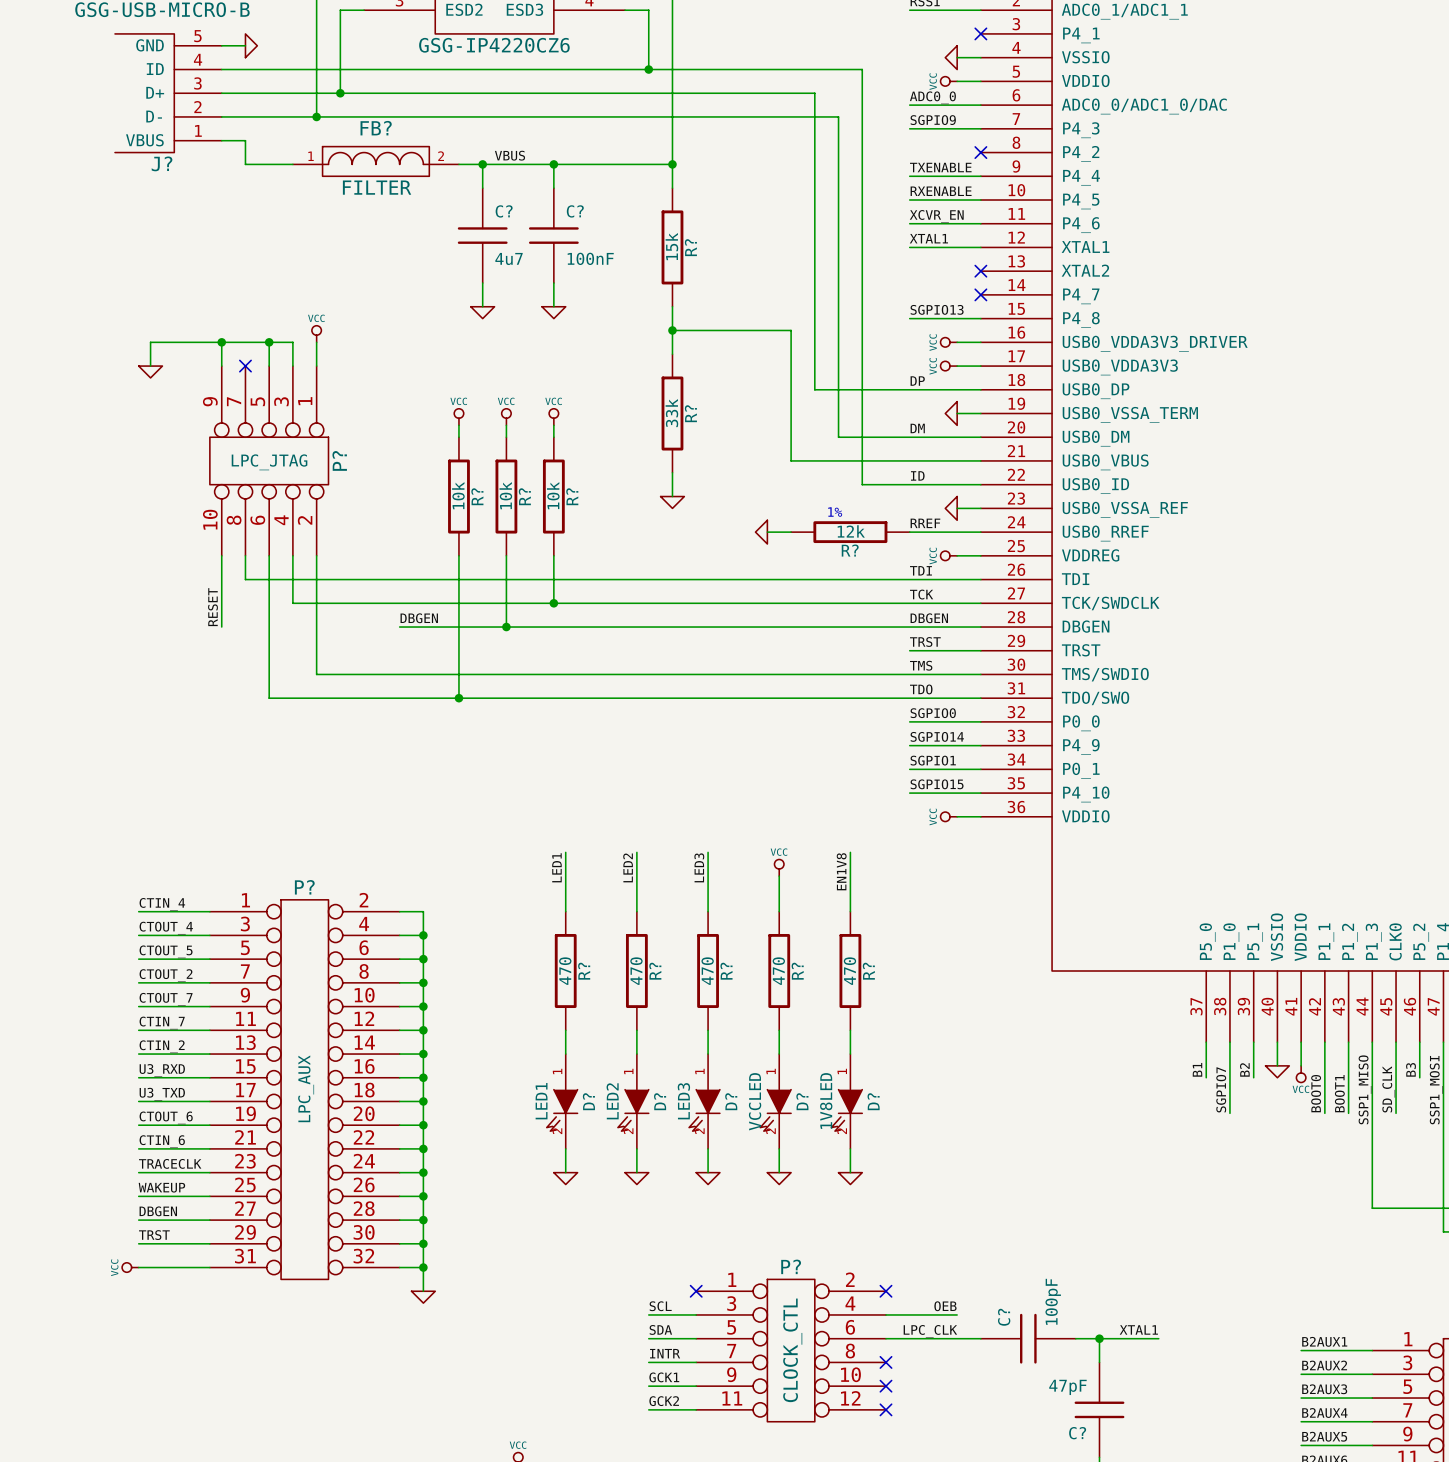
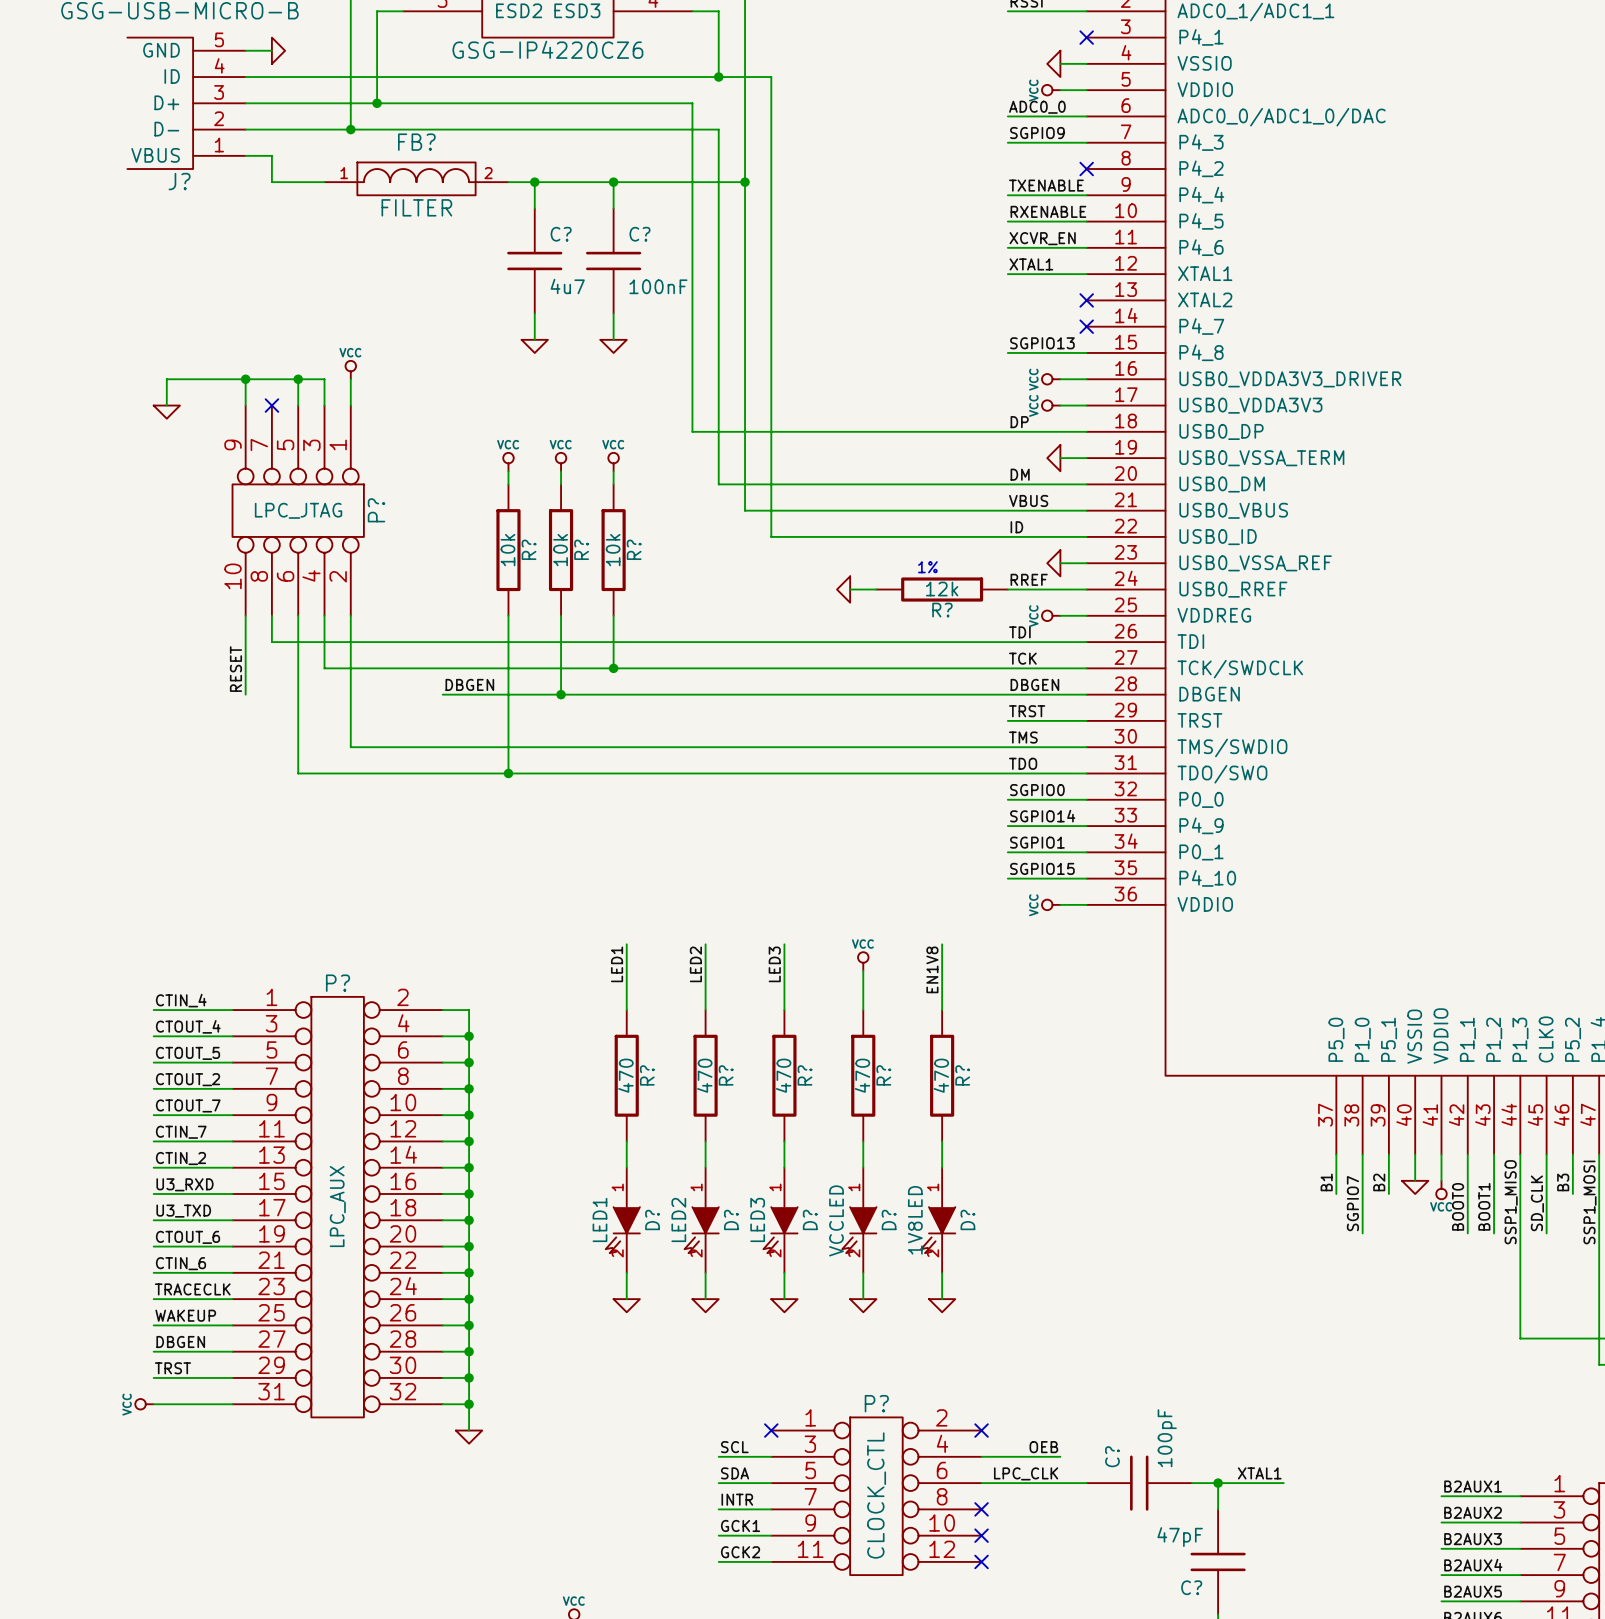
wire: (696, 69) (862, 69) (862, 484) -> (771, 77) (771, 536) (955, 536)
wire: (625, 93) (814, 93) (814, 389) -> (692, 103) (692, 431) (902, 431)
wire: (648, 116) (838, 116) (838, 437) -> (718, 129) (718, 484) (928, 484)
label: VBUS (509, 155) -> none
wire: none -> (745, 208) (745, 339)
R?: 15k (672, 247) -> none
wire: (672, 330) (791, 330) (791, 460) -> (745, 392) (745, 510) (876, 510)
junction: (672, 330) -> none
R?: 33k (672, 413) -> none
label: none -> VBUS (1028, 500)
wire: (672, 472) (672, 496) -> none
power symbol: (672, 502) -> none

